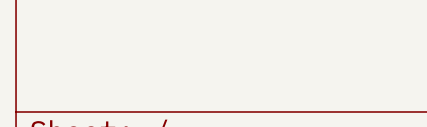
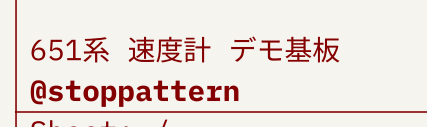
title block: none -> 651系 速度計 デモ基板 (185, 49)
title block: none -> @stoppattern (134, 93)

